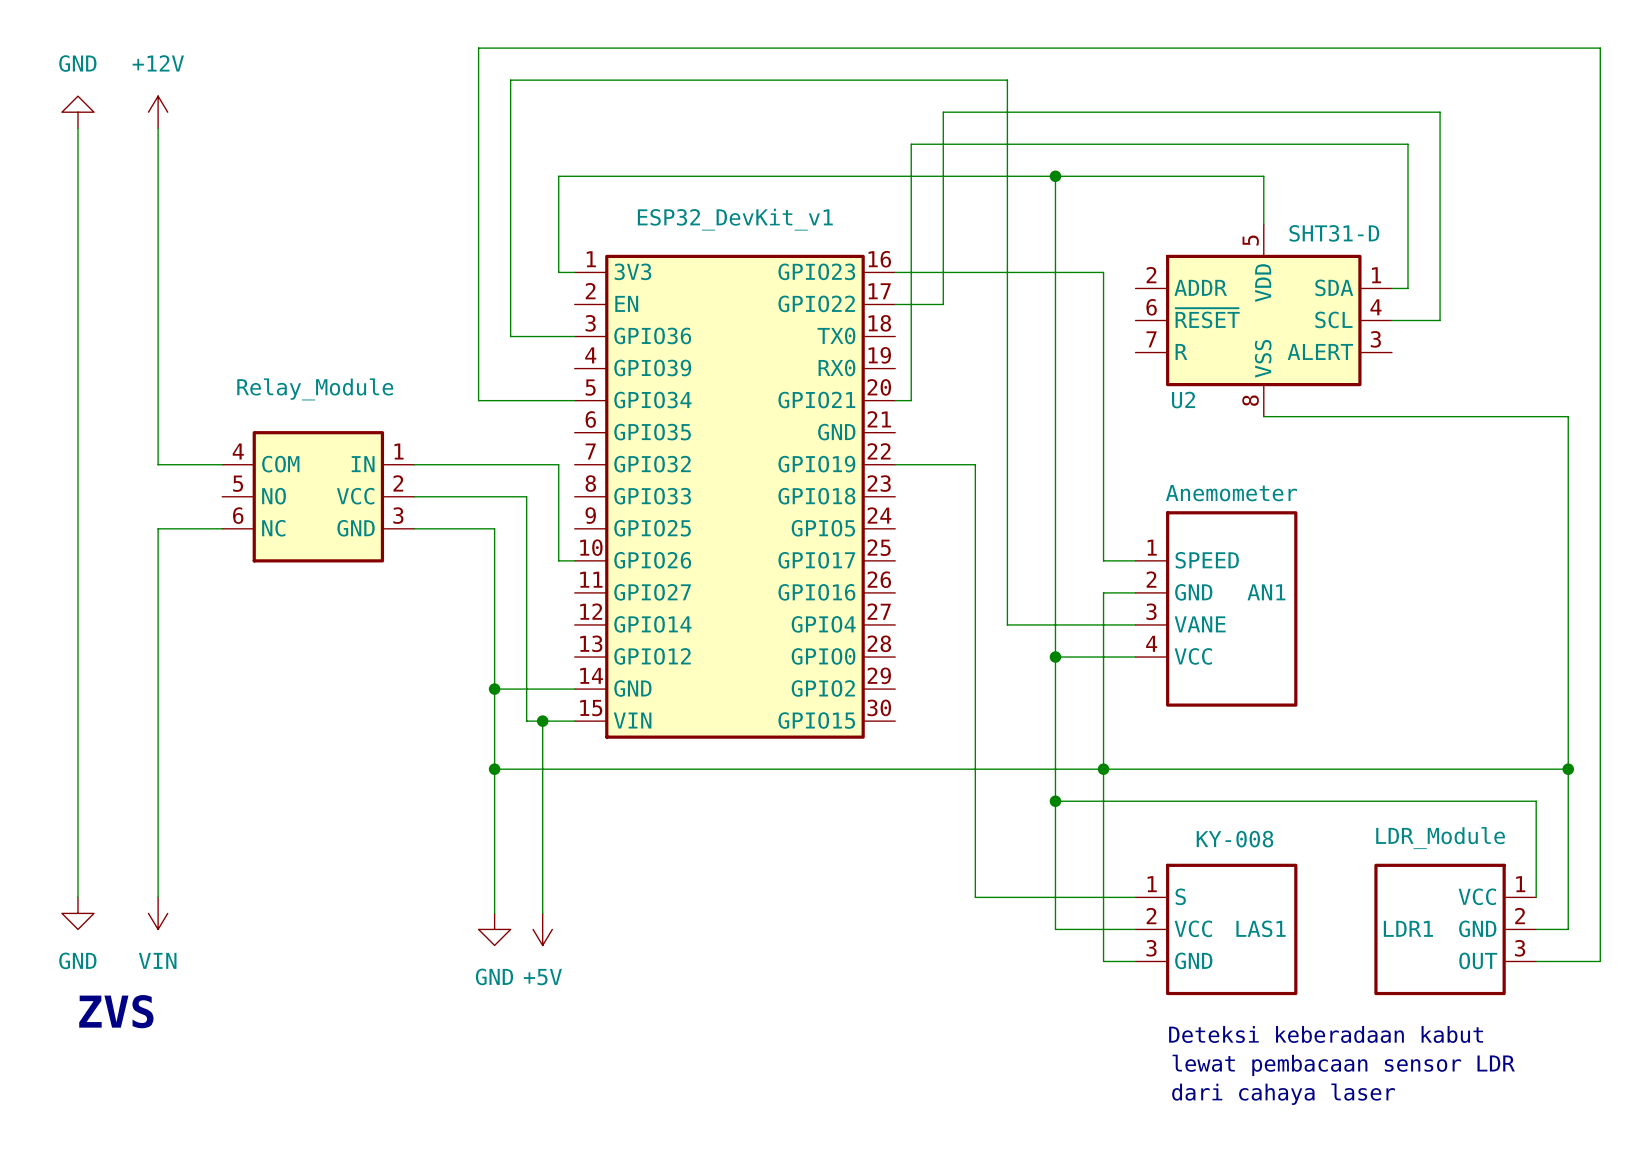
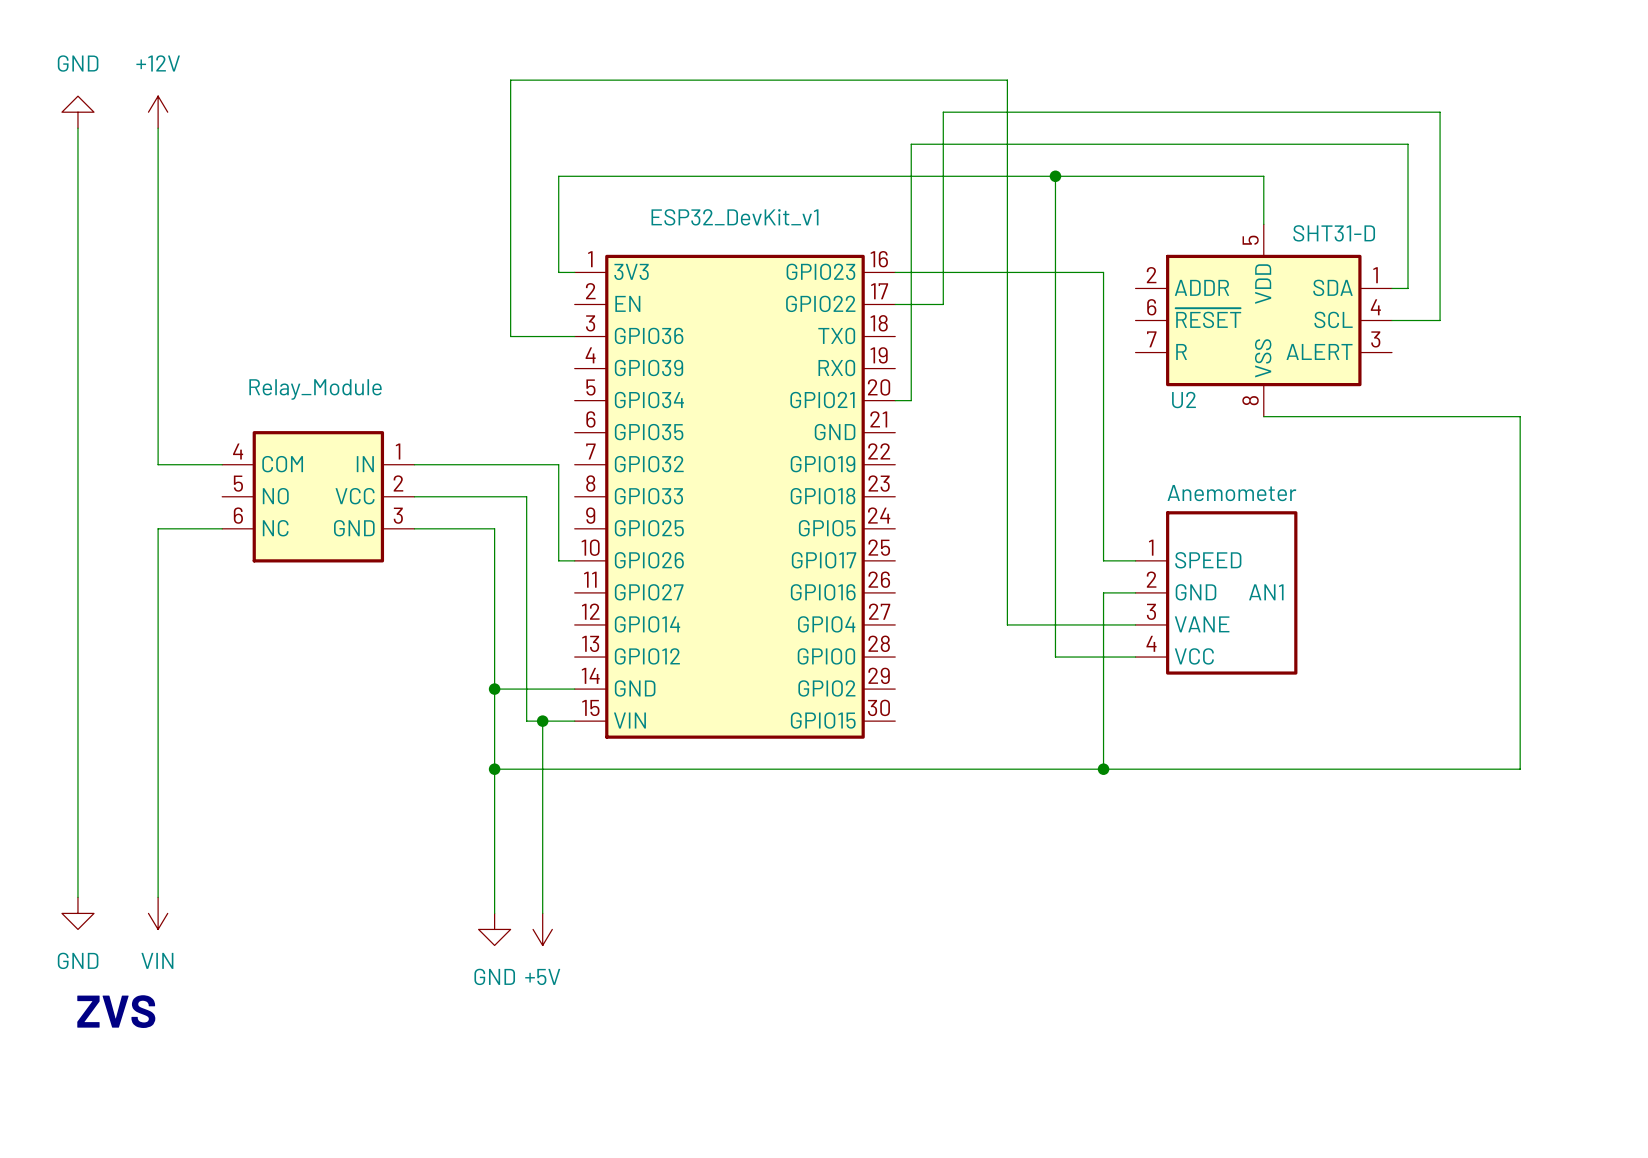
wire: (574, 400) (478, 400) (478, 48) (1600, 48) (1600, 961) (1536, 961) -> none
wire: (1520, 416) (1568, 416) (1568, 929) (1536, 929) -> (1520, 416) (1520, 769)
wire: (895, 464) (975, 464) (975, 897) (1135, 897) -> none
AN1 symbol: [1135, 511, 1298, 707] -> [1135, 511, 1298, 675]
wire: (1055, 657) (1055, 929) (1135, 929) -> none
junction: (1055, 657) -> none
wire: (1103, 769) (1103, 961) (1135, 961) -> none
wire: (1520, 769) (1568, 769) -> none
junction: (1568, 769) -> none
wire: (1055, 801) (1536, 801) (1536, 897) -> none
junction: (1055, 801) -> none
LAS1: KY-008 (1216, 929) -> none
LDR1: LDR_Module (1455, 929) -> none
text: Deteksi keberadaan kabut (1326, 1034) -> none
text: lewat pembacaan sensor LDR (1343, 1065) -> none
text: dari cahaya laser (1283, 1094) -> none

